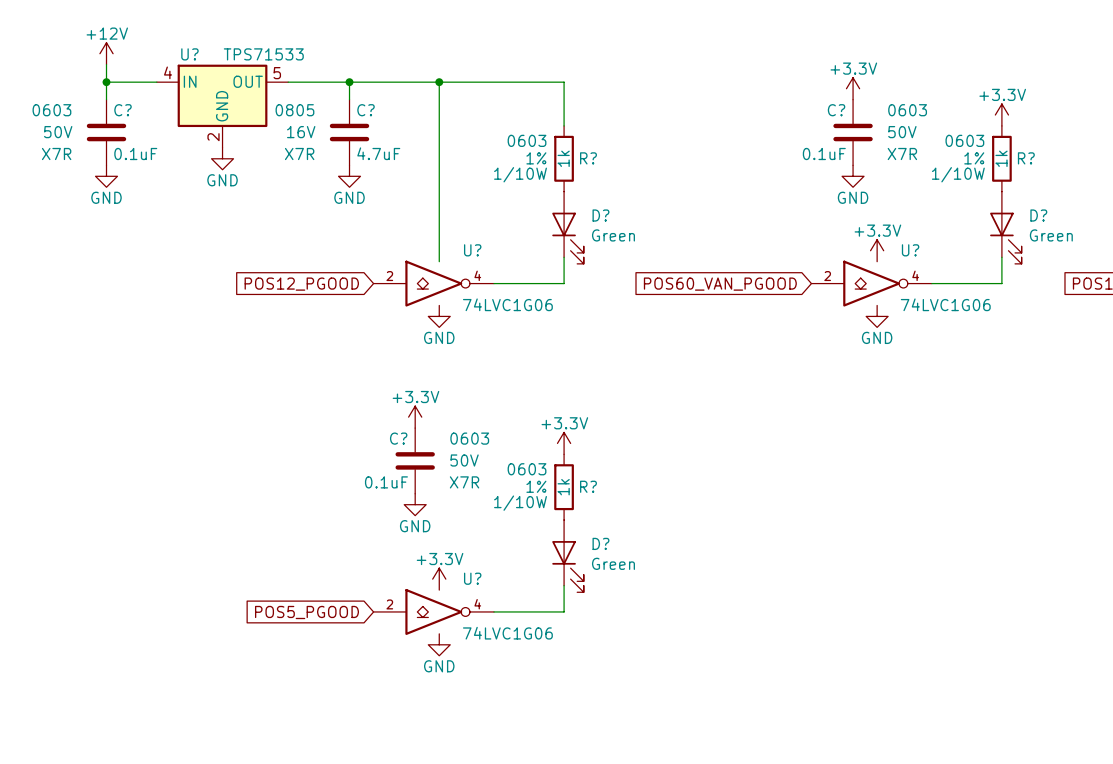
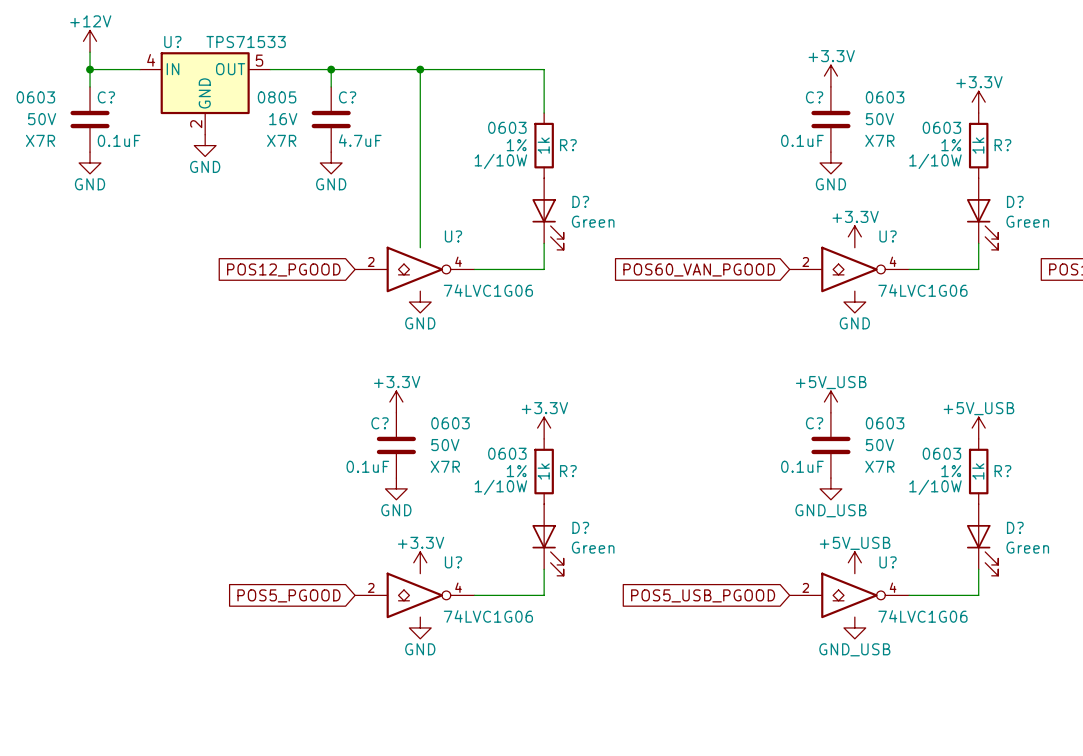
power symbol: none -> +5V_USB (830, 402)
power symbol: none -> +5V_USB (978, 428)
C?: none -> 0.1uF (830, 445)
R?: none -> 1k (978, 471)
power symbol: none -> GND_USB (830, 488)
D?: none -> Green (982, 539)
power symbol: none -> +5V_USB (854, 562)
wire: none -> (978, 569) (978, 595) (909, 595)
U?: none -> 74LVC1G06 (849, 595)
global label: none -> POS5_USB_PGOOD (703, 595)
power symbol: none -> GND_USB (854, 627)

